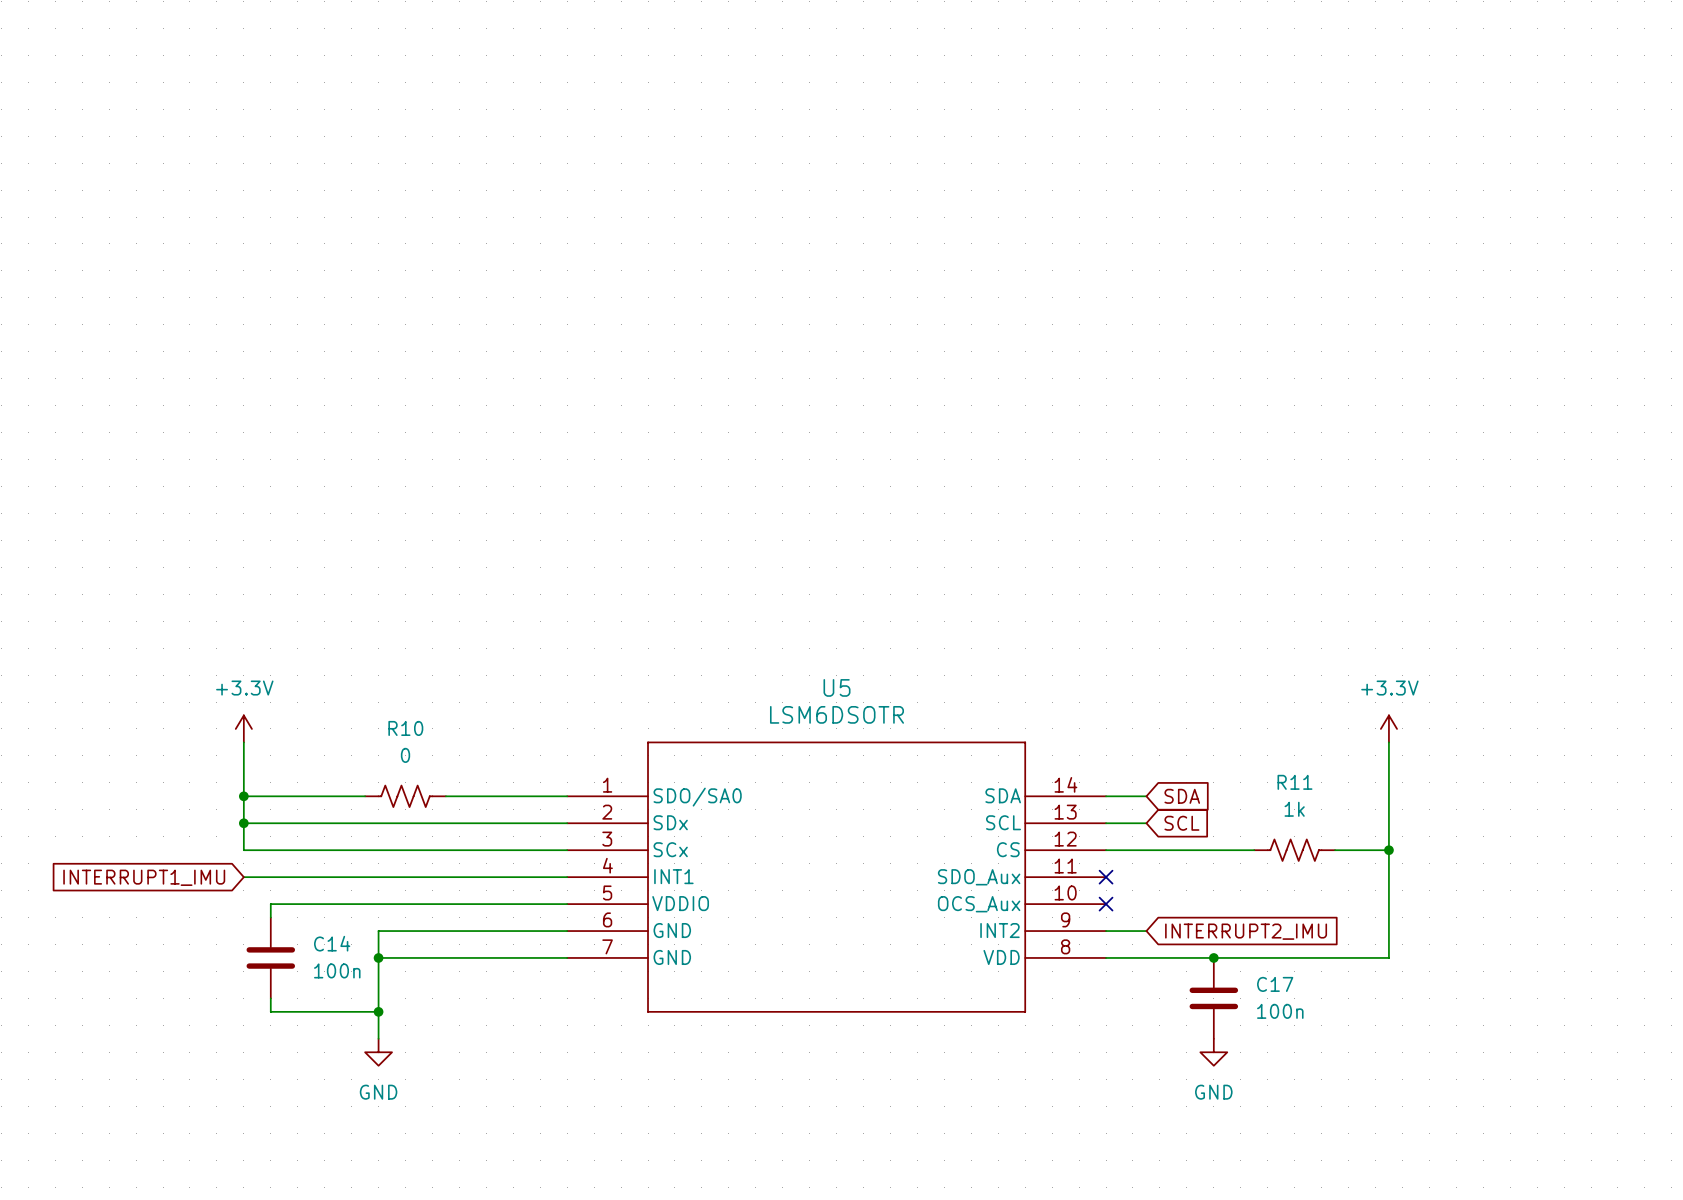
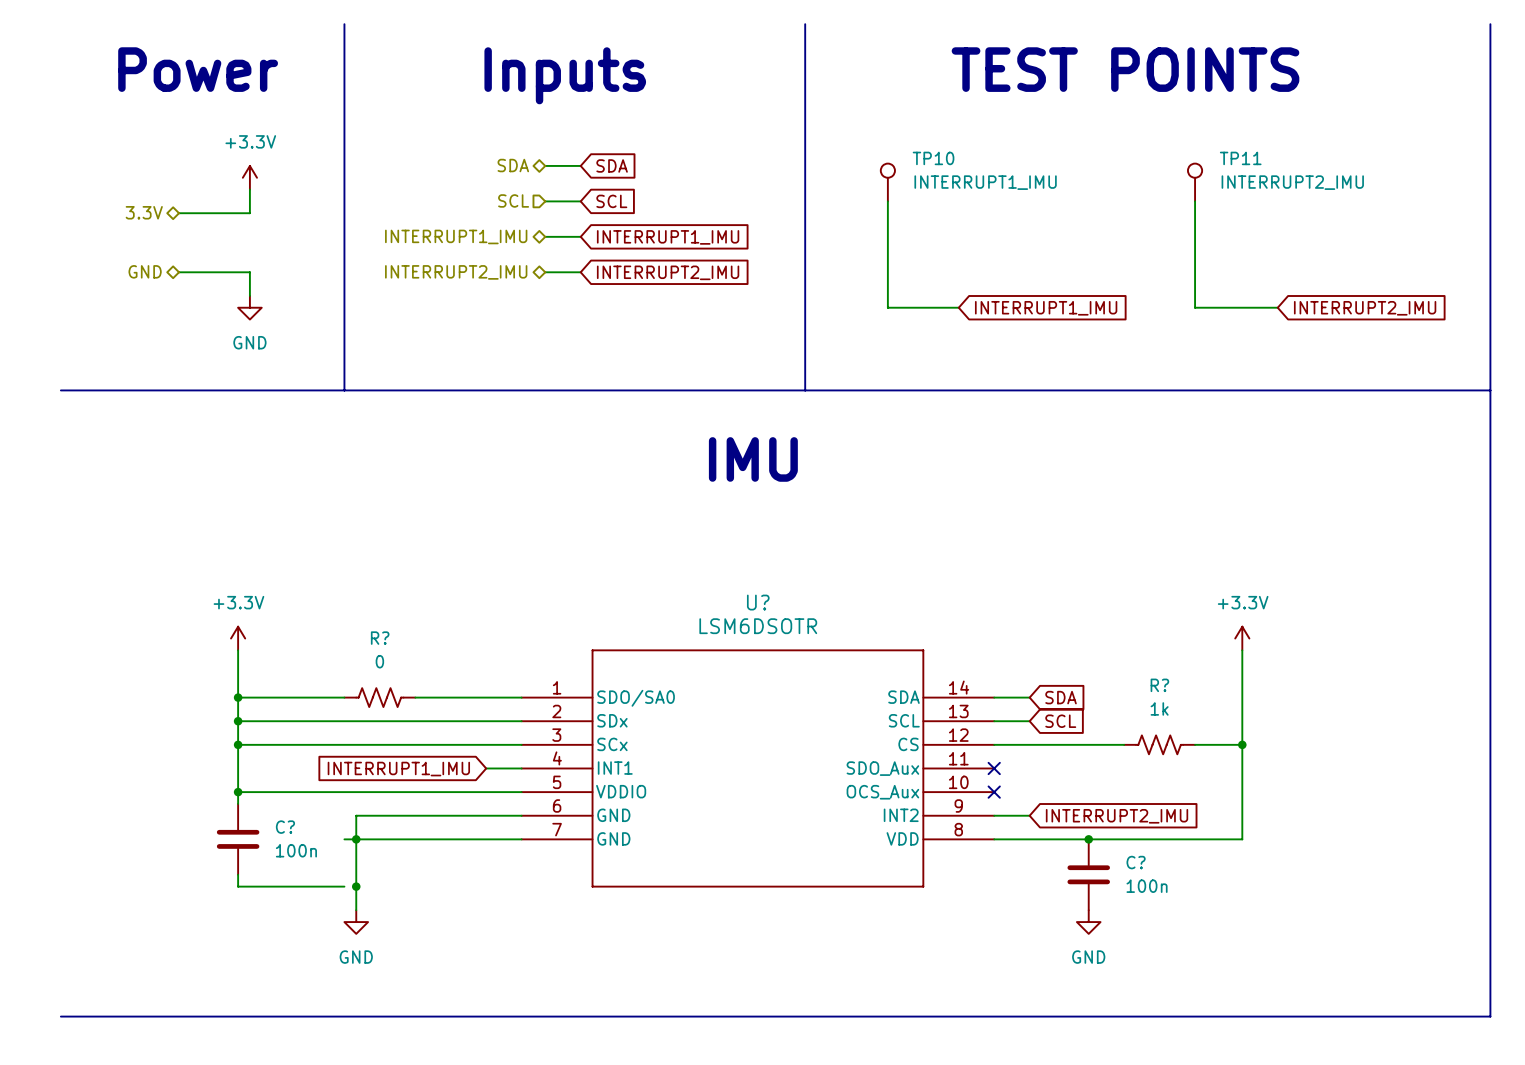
line: none -> (344, 24) (344, 390)
line: none -> (805, 24) (805, 390)
line: none -> (1490, 24) (1490, 1016) (60, 1016)
text: none -> Power (198, 69)
text: none -> TEST POINTS (1125, 69)
text: none -> Inputs (565, 75)
hierarchical label: none -> SDA (513, 165)
wire: none -> (545, 165) (580, 165)
global label: none -> SDA (612, 165)
power symbol: none -> +3.3V (249, 177)
TP10: none -> INTERRUPT1_IMU (887, 182)
TP11: none -> INTERRUPT2_IMU (1195, 182)
wire: none -> (249, 189) (249, 213) (179, 213)
hierarchical label: none -> SCL (513, 200)
wire: none -> (545, 201) (580, 201)
global label: none -> SCL (611, 201)
wire: none -> (887, 201) (887, 307) (958, 307)
wire: none -> (1195, 201) (1195, 307) (1277, 307)
hierarchical label: none -> 3.3V (144, 212)
wire: none -> (545, 236) (580, 236)
hierarchical label: none -> INTERRUPT1_IMU (456, 236)
global label: none -> INTERRUPT1_IMU (668, 237)
hierarchical label: none -> GND (145, 271)
wire: none -> (179, 272) (249, 272) (249, 295)
hierarchical label: none -> INTERRUPT2_IMU (456, 272)
wire: none -> (545, 272) (580, 272)
global label: none -> INTERRUPT2_IMU (668, 272)
power symbol: none -> GND (249, 307)
global label: none -> INTERRUPT1_IMU (1046, 308)
global label: none -> INTERRUPT2_IMU (1365, 308)
line: none -> (60, 390) (1490, 390)
text: none -> IMU (753, 459)
U5 name: U5 (836, 687) -> U? (758, 602)
R10 name: R10 (405, 728) -> R? (380, 638)
R11 name: R11 (1294, 782) -> R? (1159, 685)
wire: none -> (238, 744) (238, 803)
junction: none -> (238, 744)
global label: INTERRUPT1_IMU (144, 877) -> none
wire: (243, 877) (526, 877) -> none
global label: none -> INTERRUPT1_IMU (398, 769)
junction: none -> (238, 792)
wire: (270, 904) (270, 917) -> (261, 792) (238, 792)
C?: none -> 100n (238, 839)
C14: 100n (270, 957) -> none
C17 name: C17 (1275, 984) -> C? (1136, 862)
wire: (270, 998) (270, 1011) -> (238, 874) (238, 886) (261, 886)
wire: (365, 1011) (378, 1011) -> (344, 839) (356, 839)

